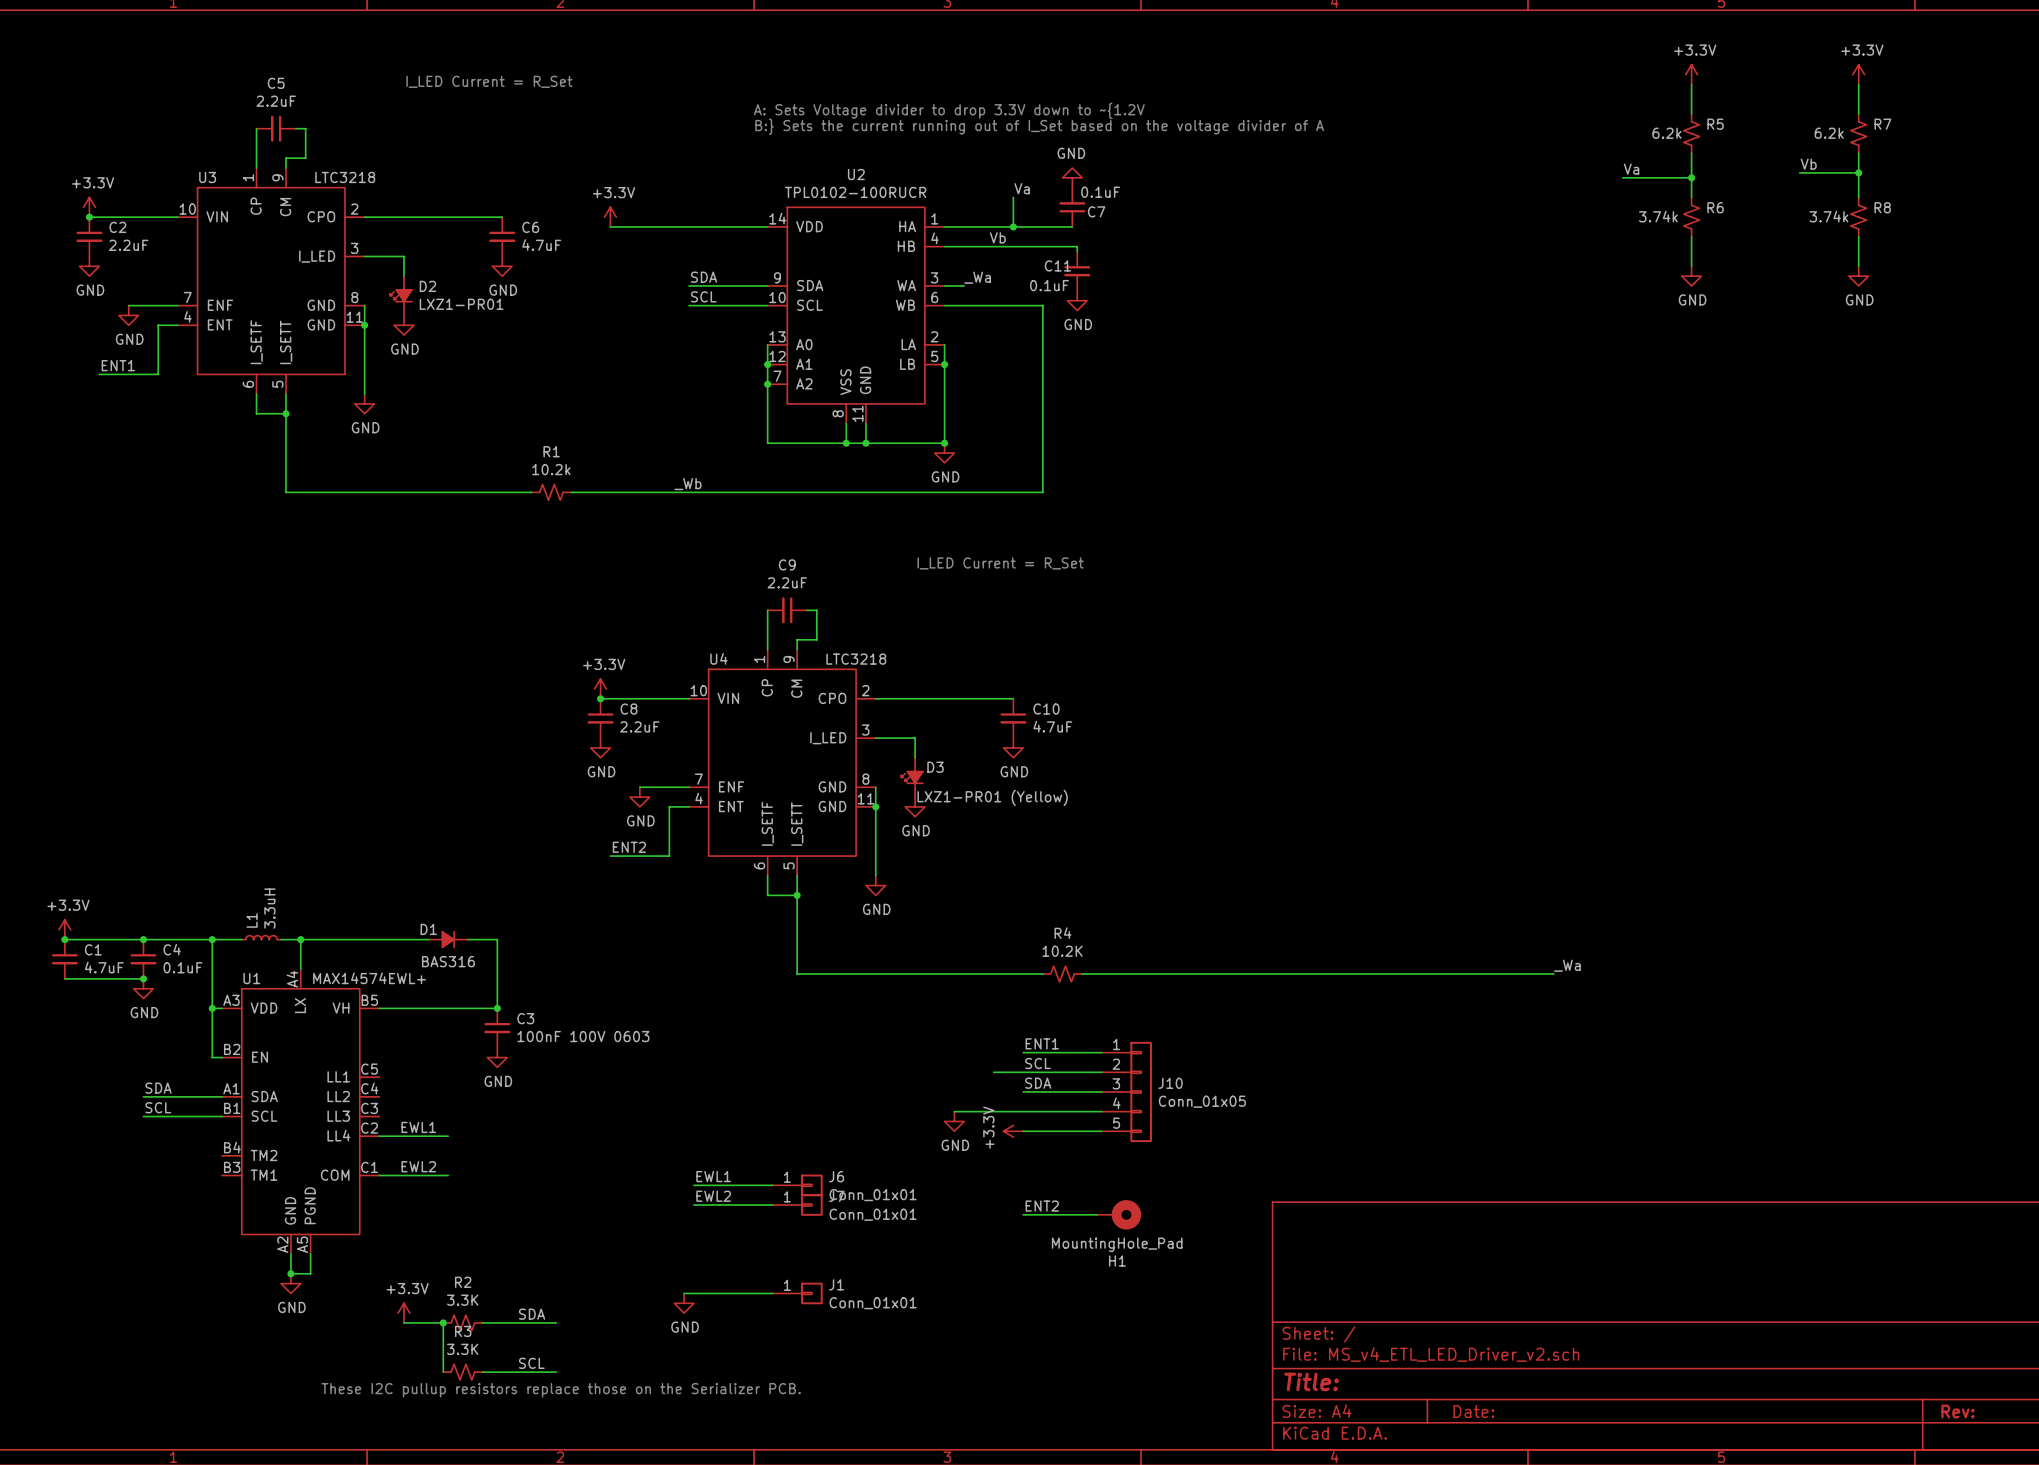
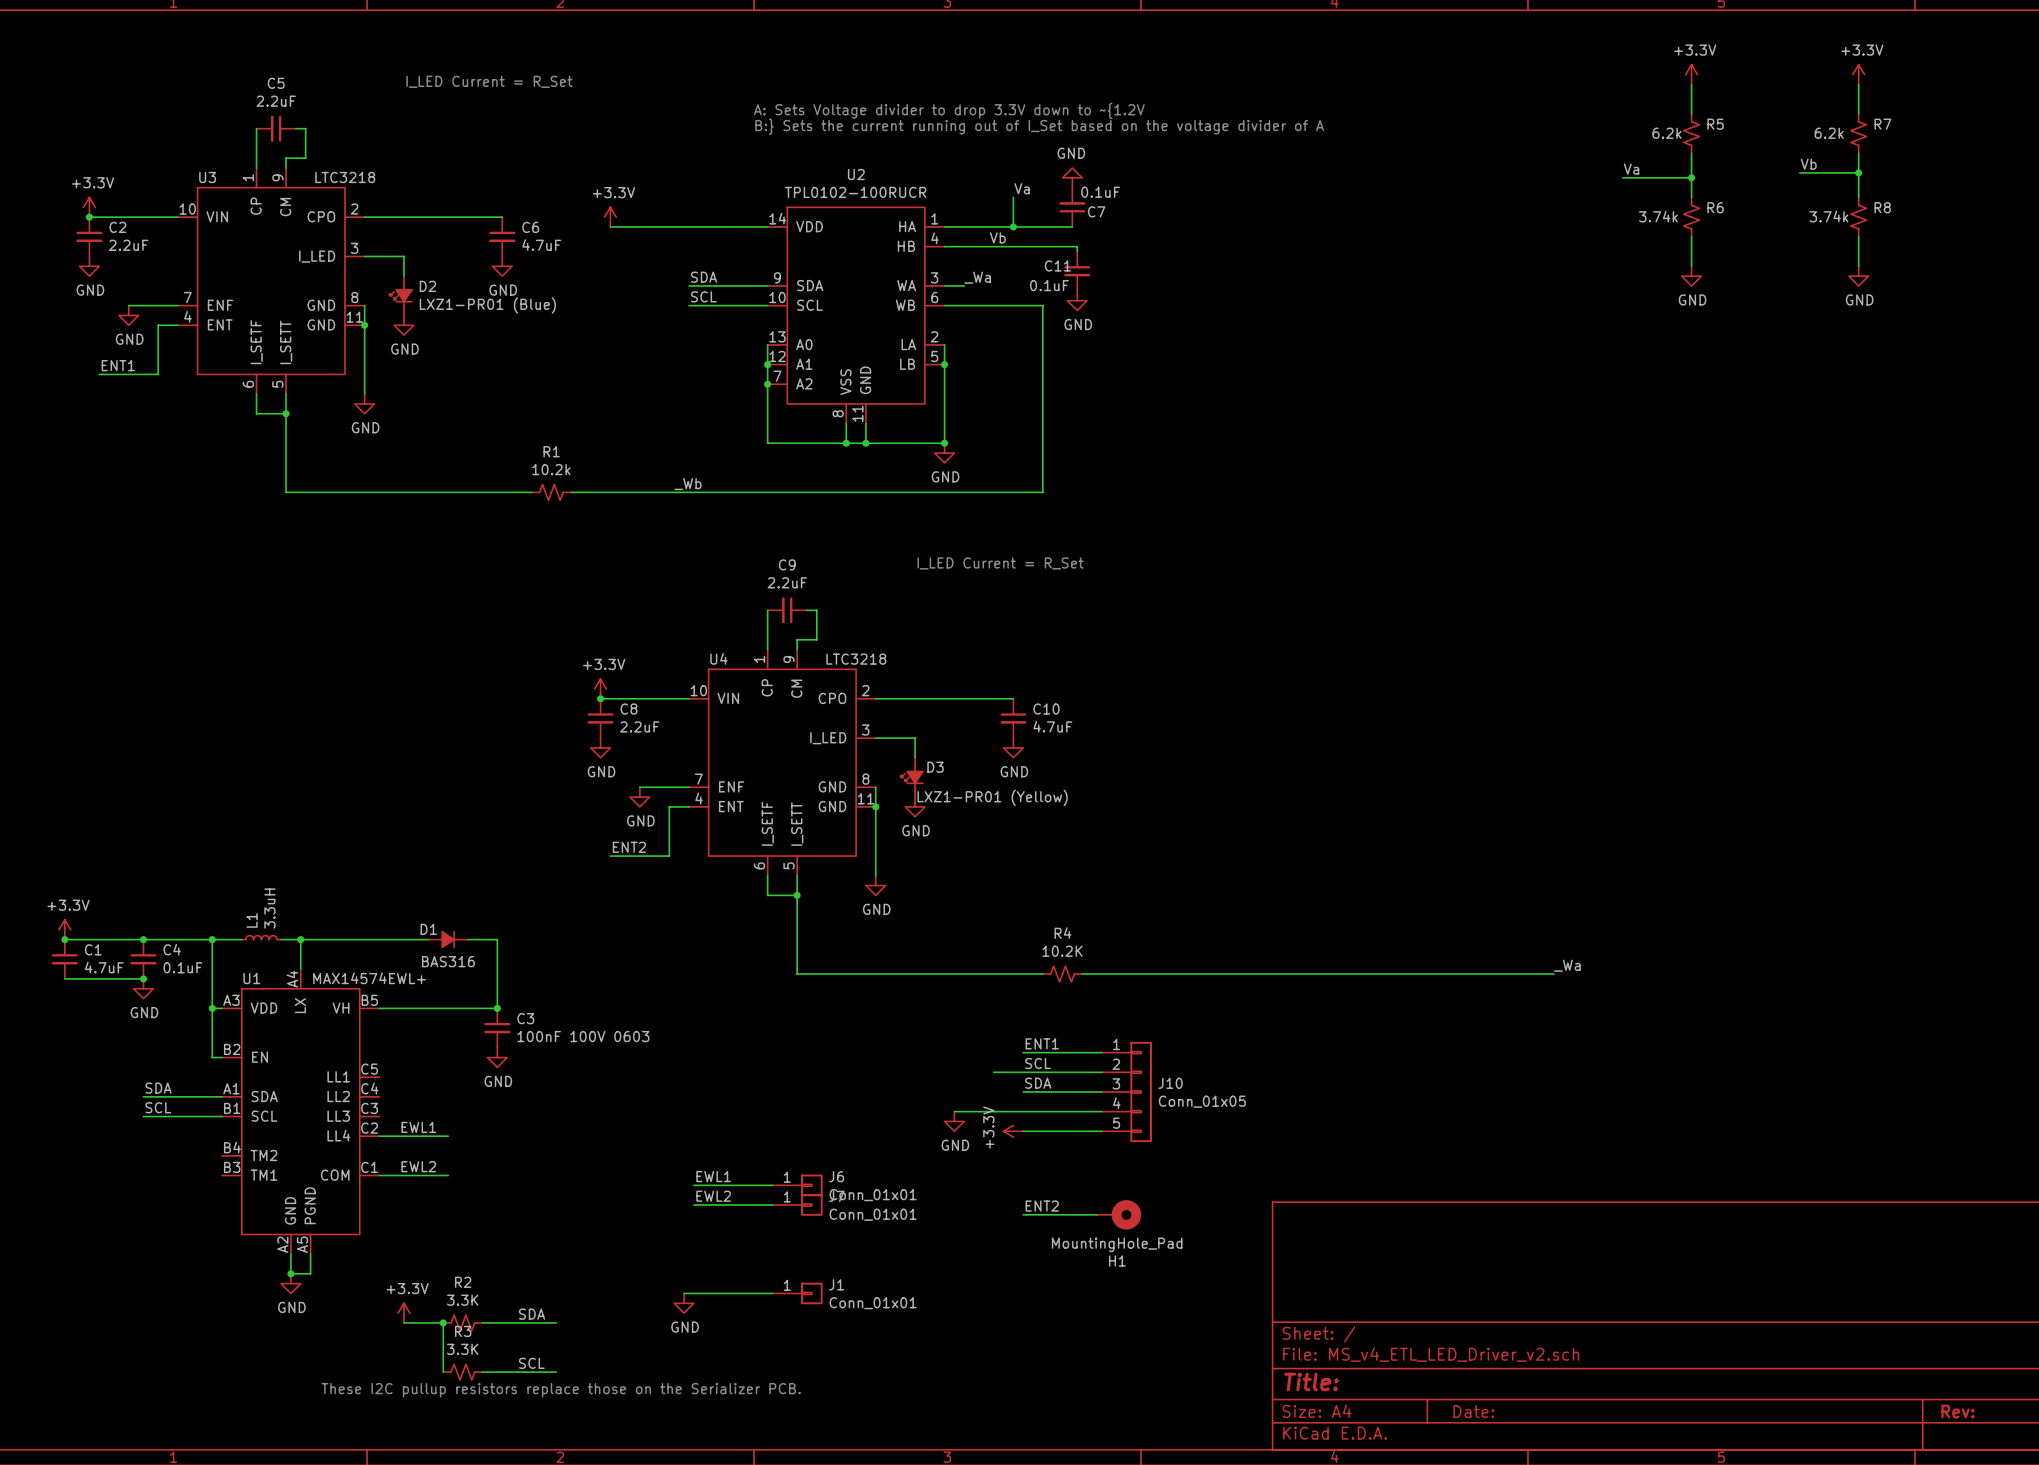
D2 value: LXZ1-PR01 (461, 304) -> LXZ1-PR01 (Blue) (487, 305)

